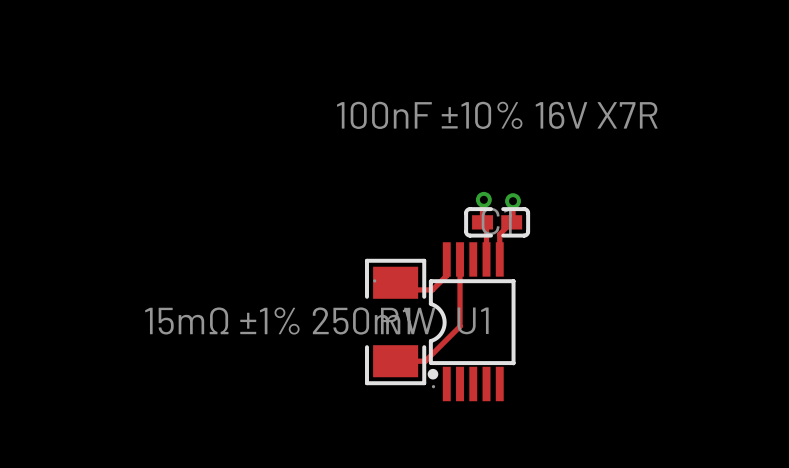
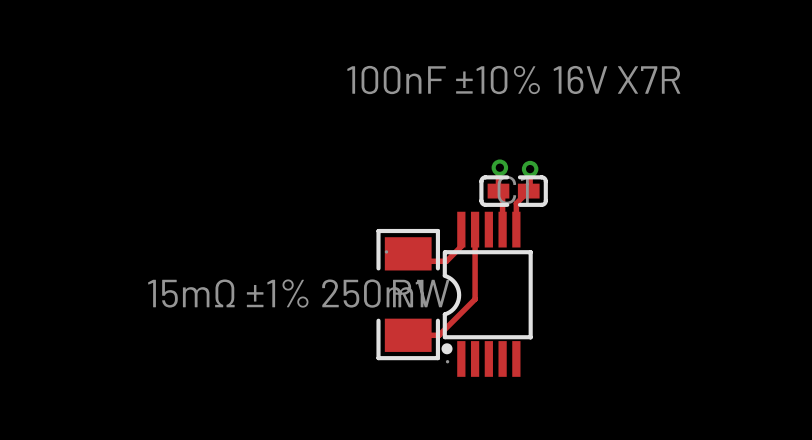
U1 name: U1 (473, 320) -> none

